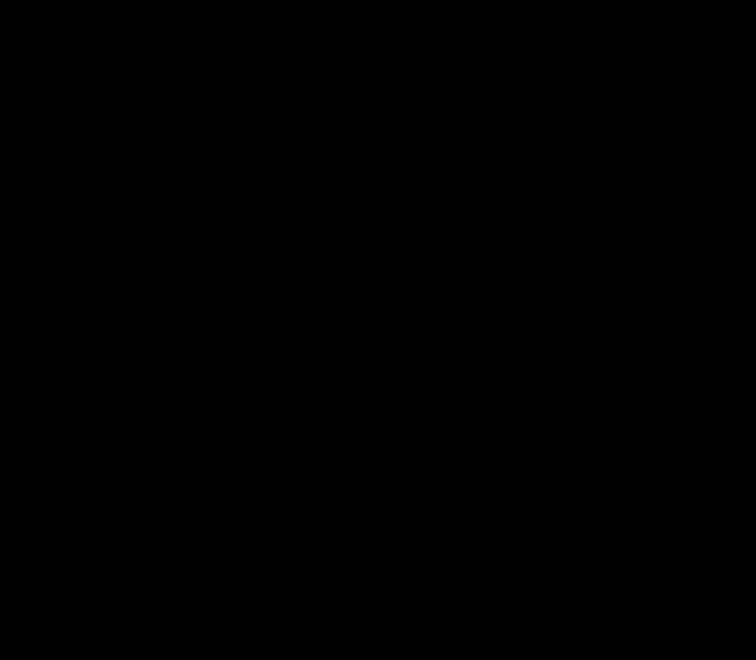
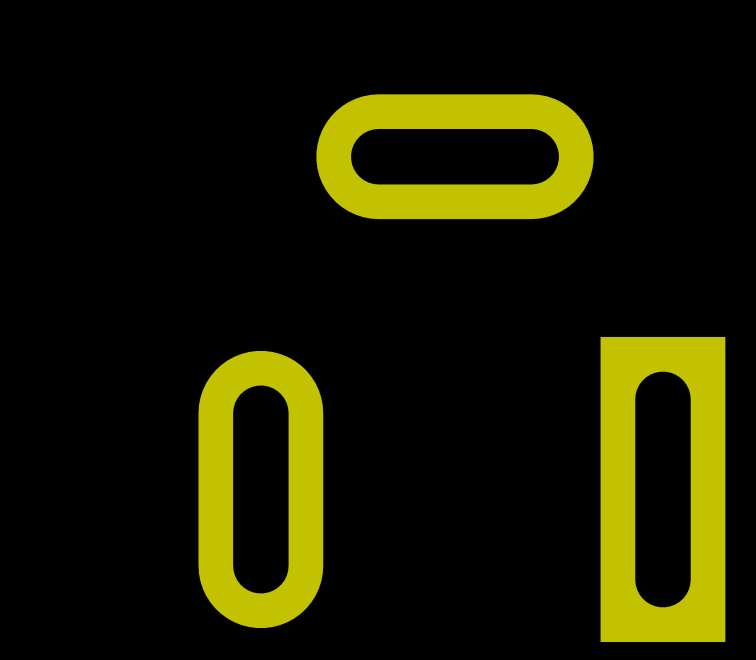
part: none -> (461, 368)

